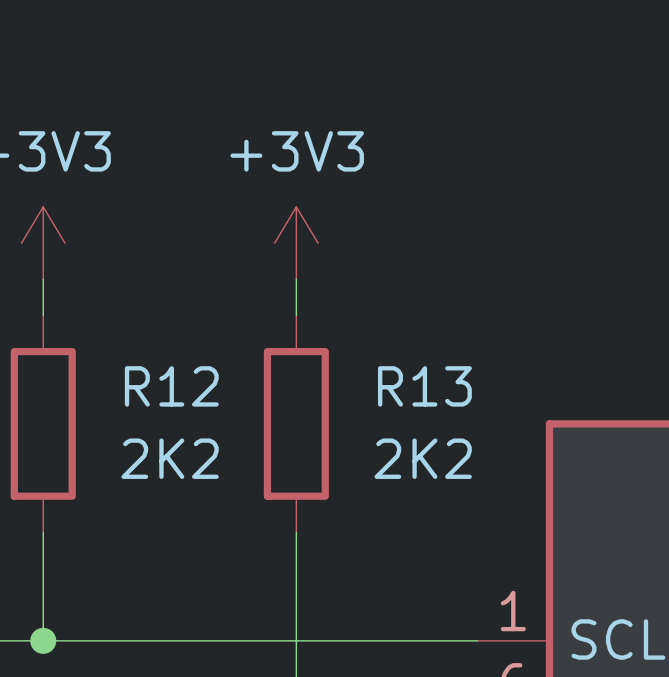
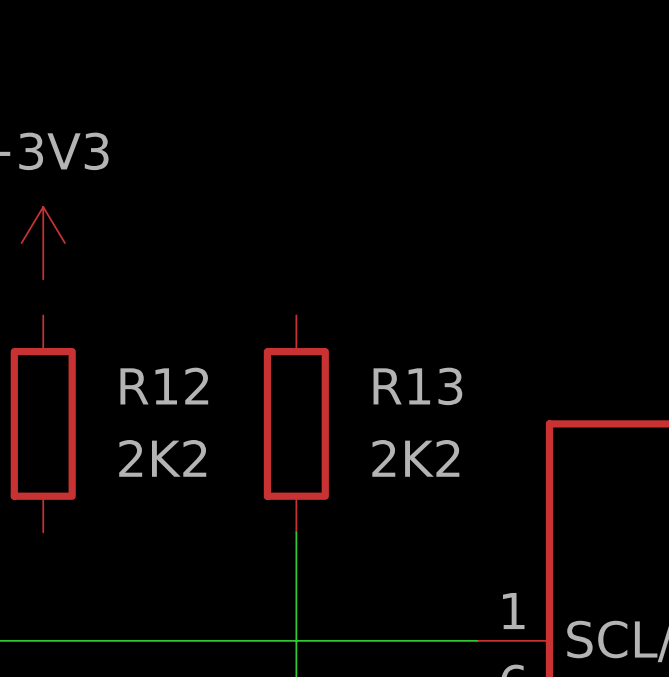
power symbol: +3V3 (296, 243) -> none
wire: (43, 279) (43, 315) -> none
wire: (296, 279) (296, 315) -> none
wire: (43, 532) (43, 640) -> none
junction: (43, 640) -> none

